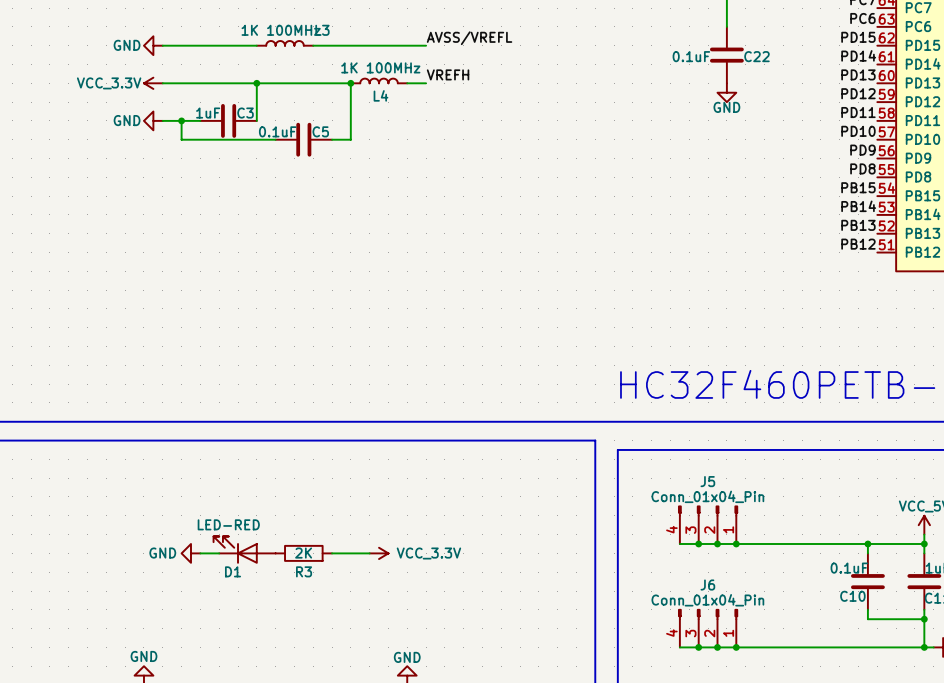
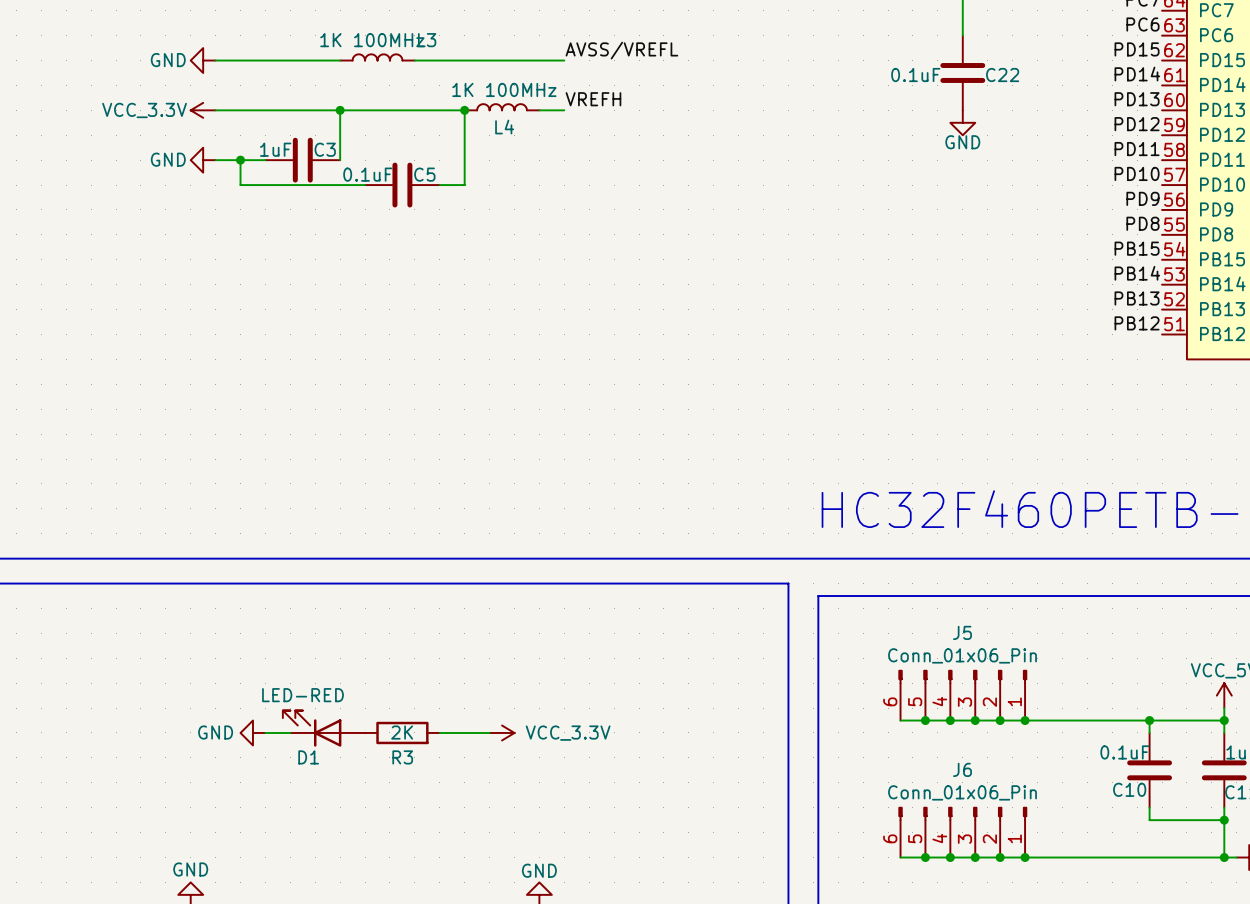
J5 value: Conn_01x04_Pin (707, 496) -> Conn_01x06_Pin (962, 655)
J5 symbol: [678, 505, 738, 544] -> [898, 669, 1028, 721]
junction: none -> (1000, 720)
junction: none -> (1025, 720)
J6 value: Conn_01x04_Pin (707, 600) -> Conn_01x06_Pin (962, 792)
J6 symbol: [678, 609, 738, 648] -> [898, 806, 1028, 858]
junction: none -> (1000, 857)
junction: none -> (1025, 857)

